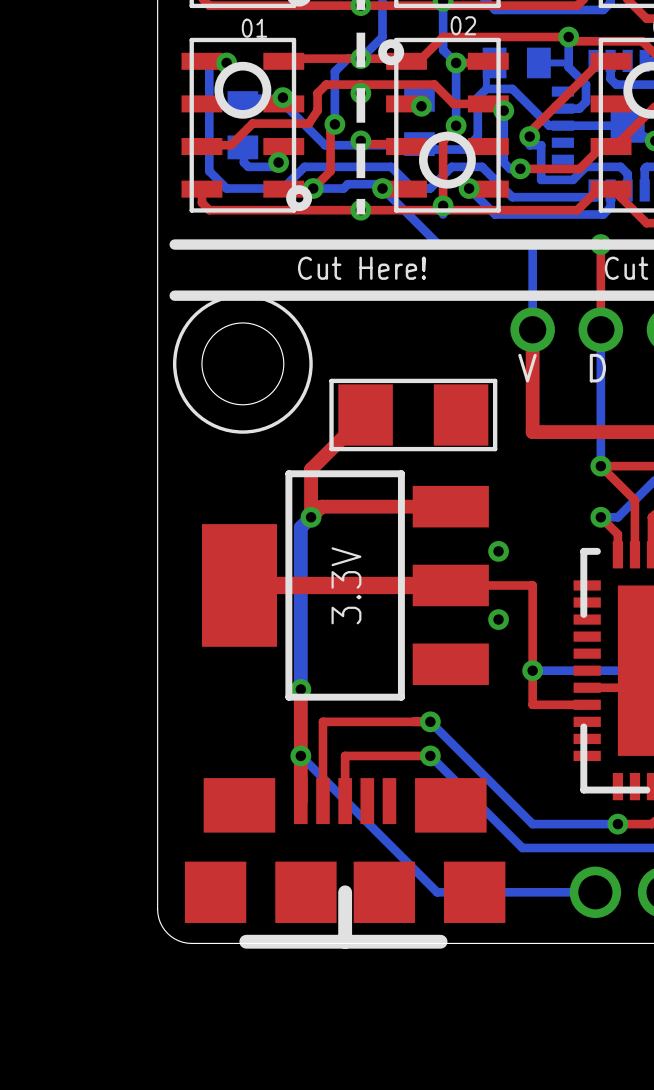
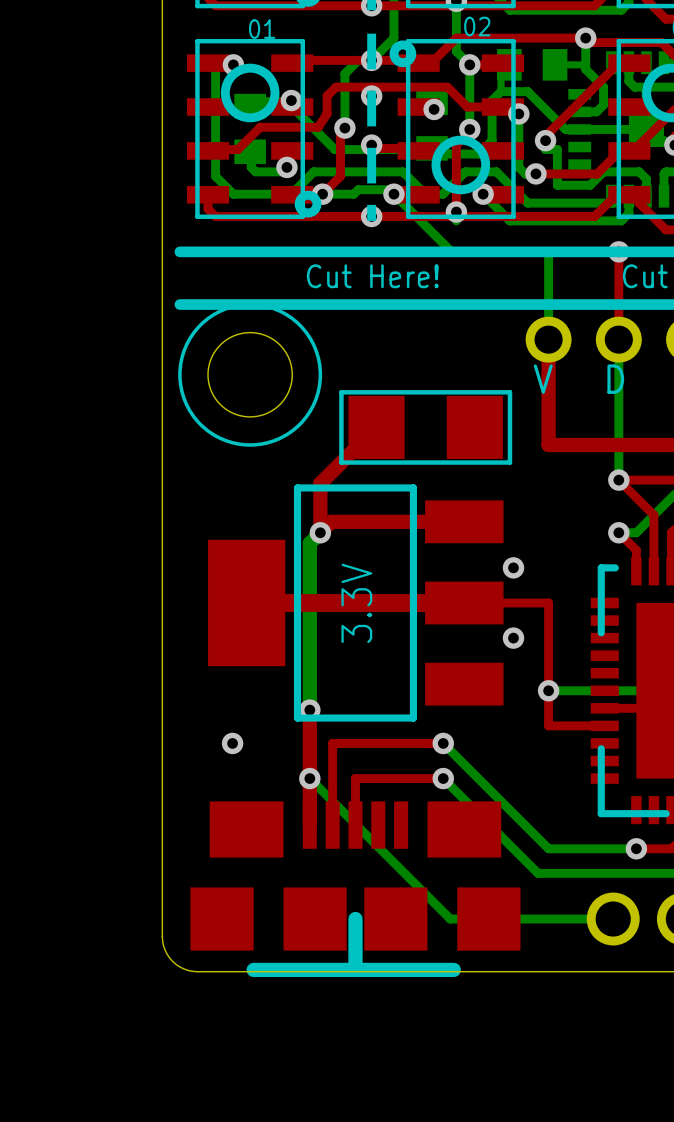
via: none -> (232, 743)

